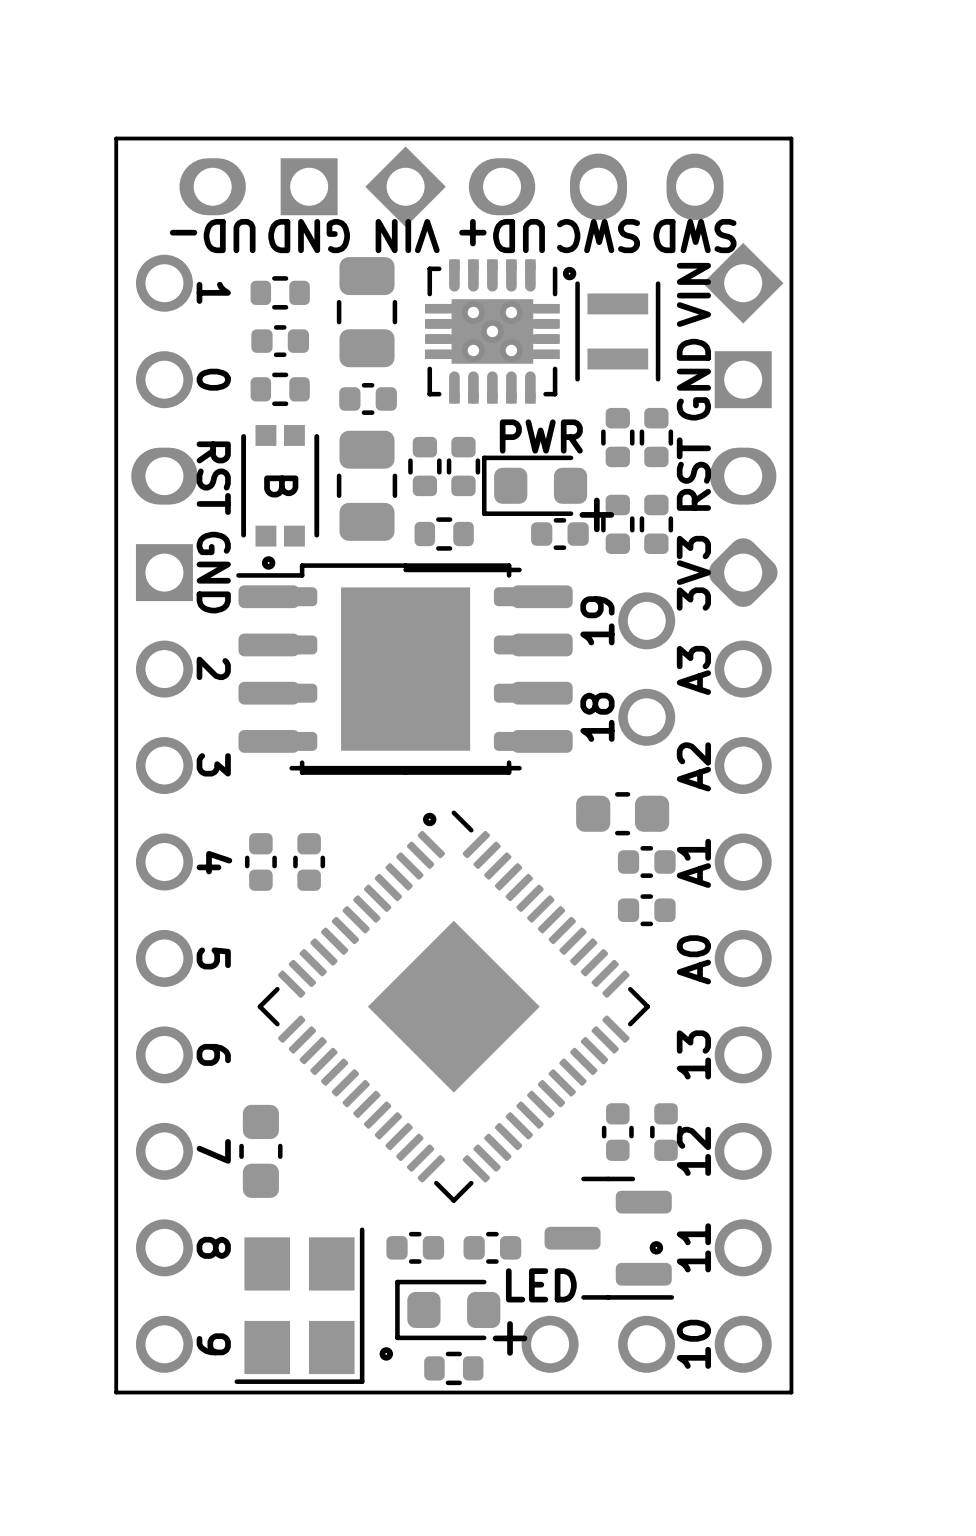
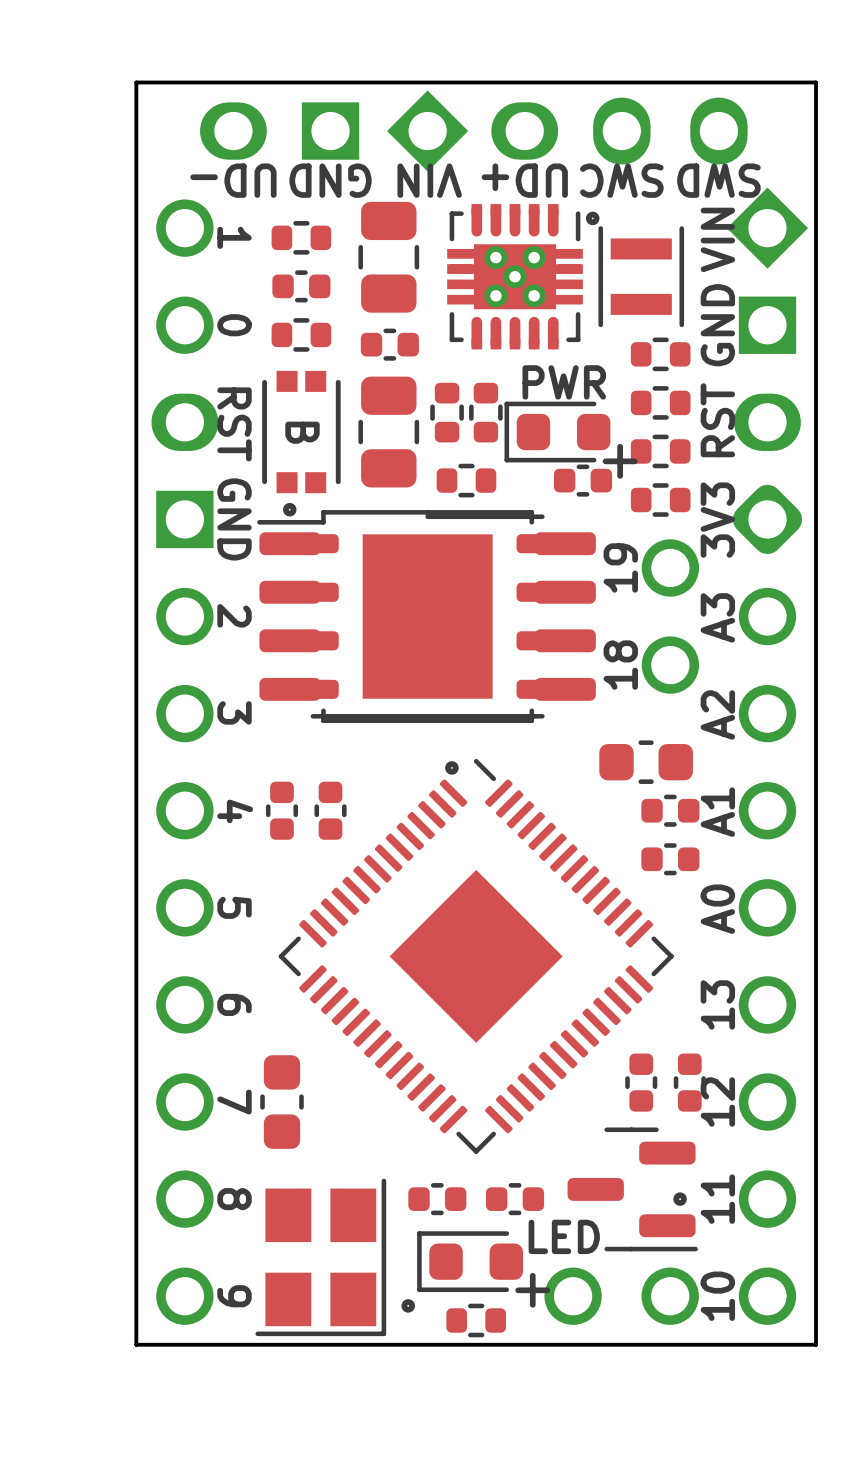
part: none -> (660, 354)
part: (617, 437) -> none
part: (656, 437) -> none
part: none -> (660, 402)
part: none -> (660, 451)
part: (617, 524) -> none
part: (656, 524) -> none
part: none -> (660, 500)

